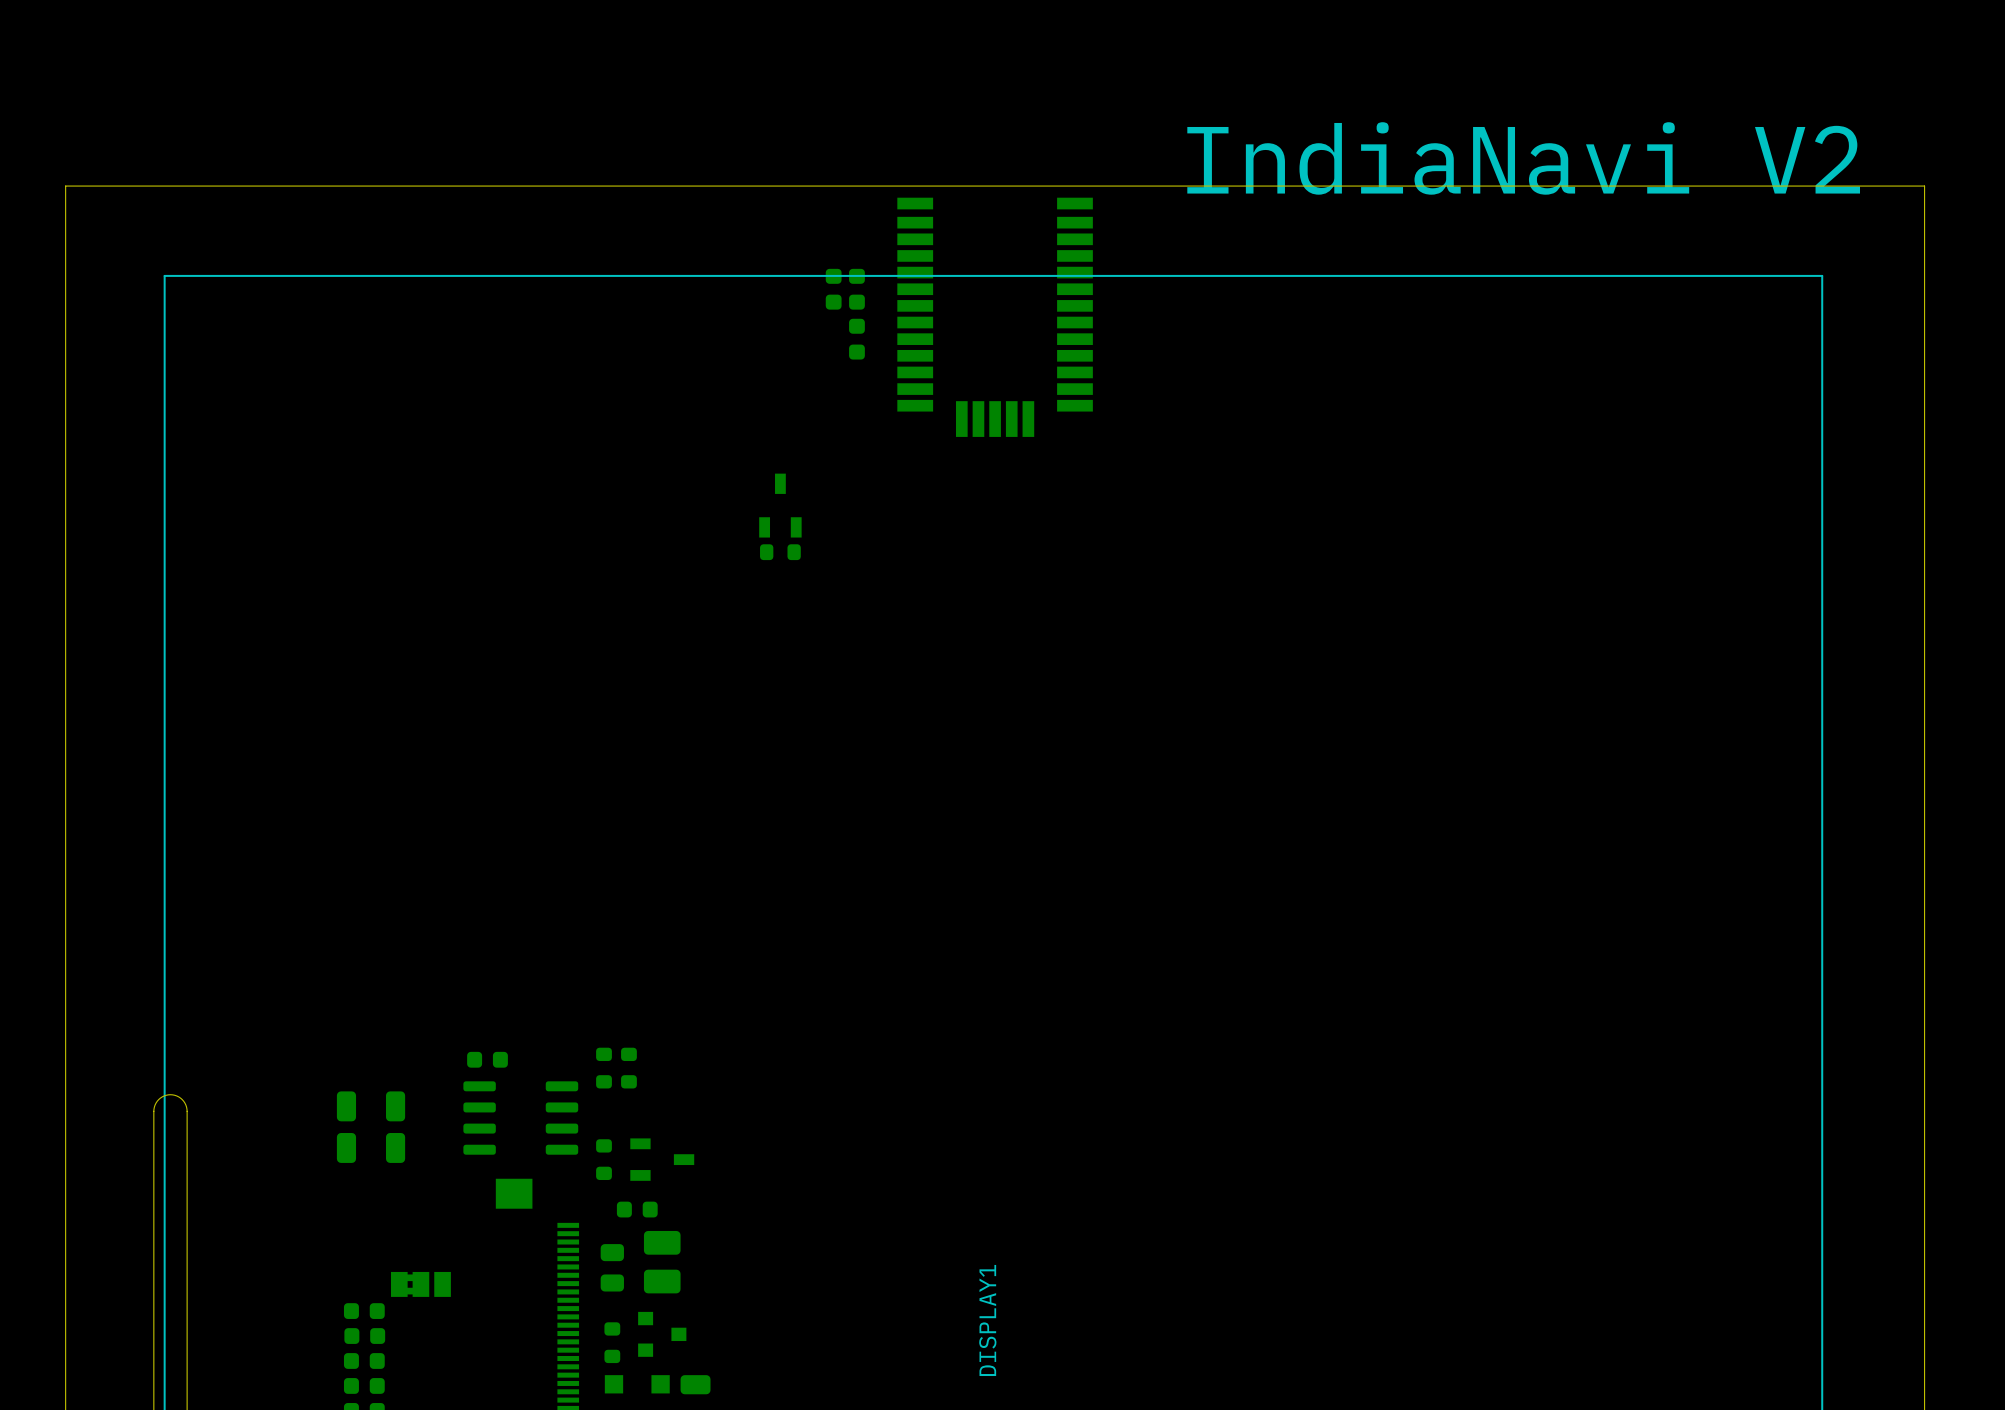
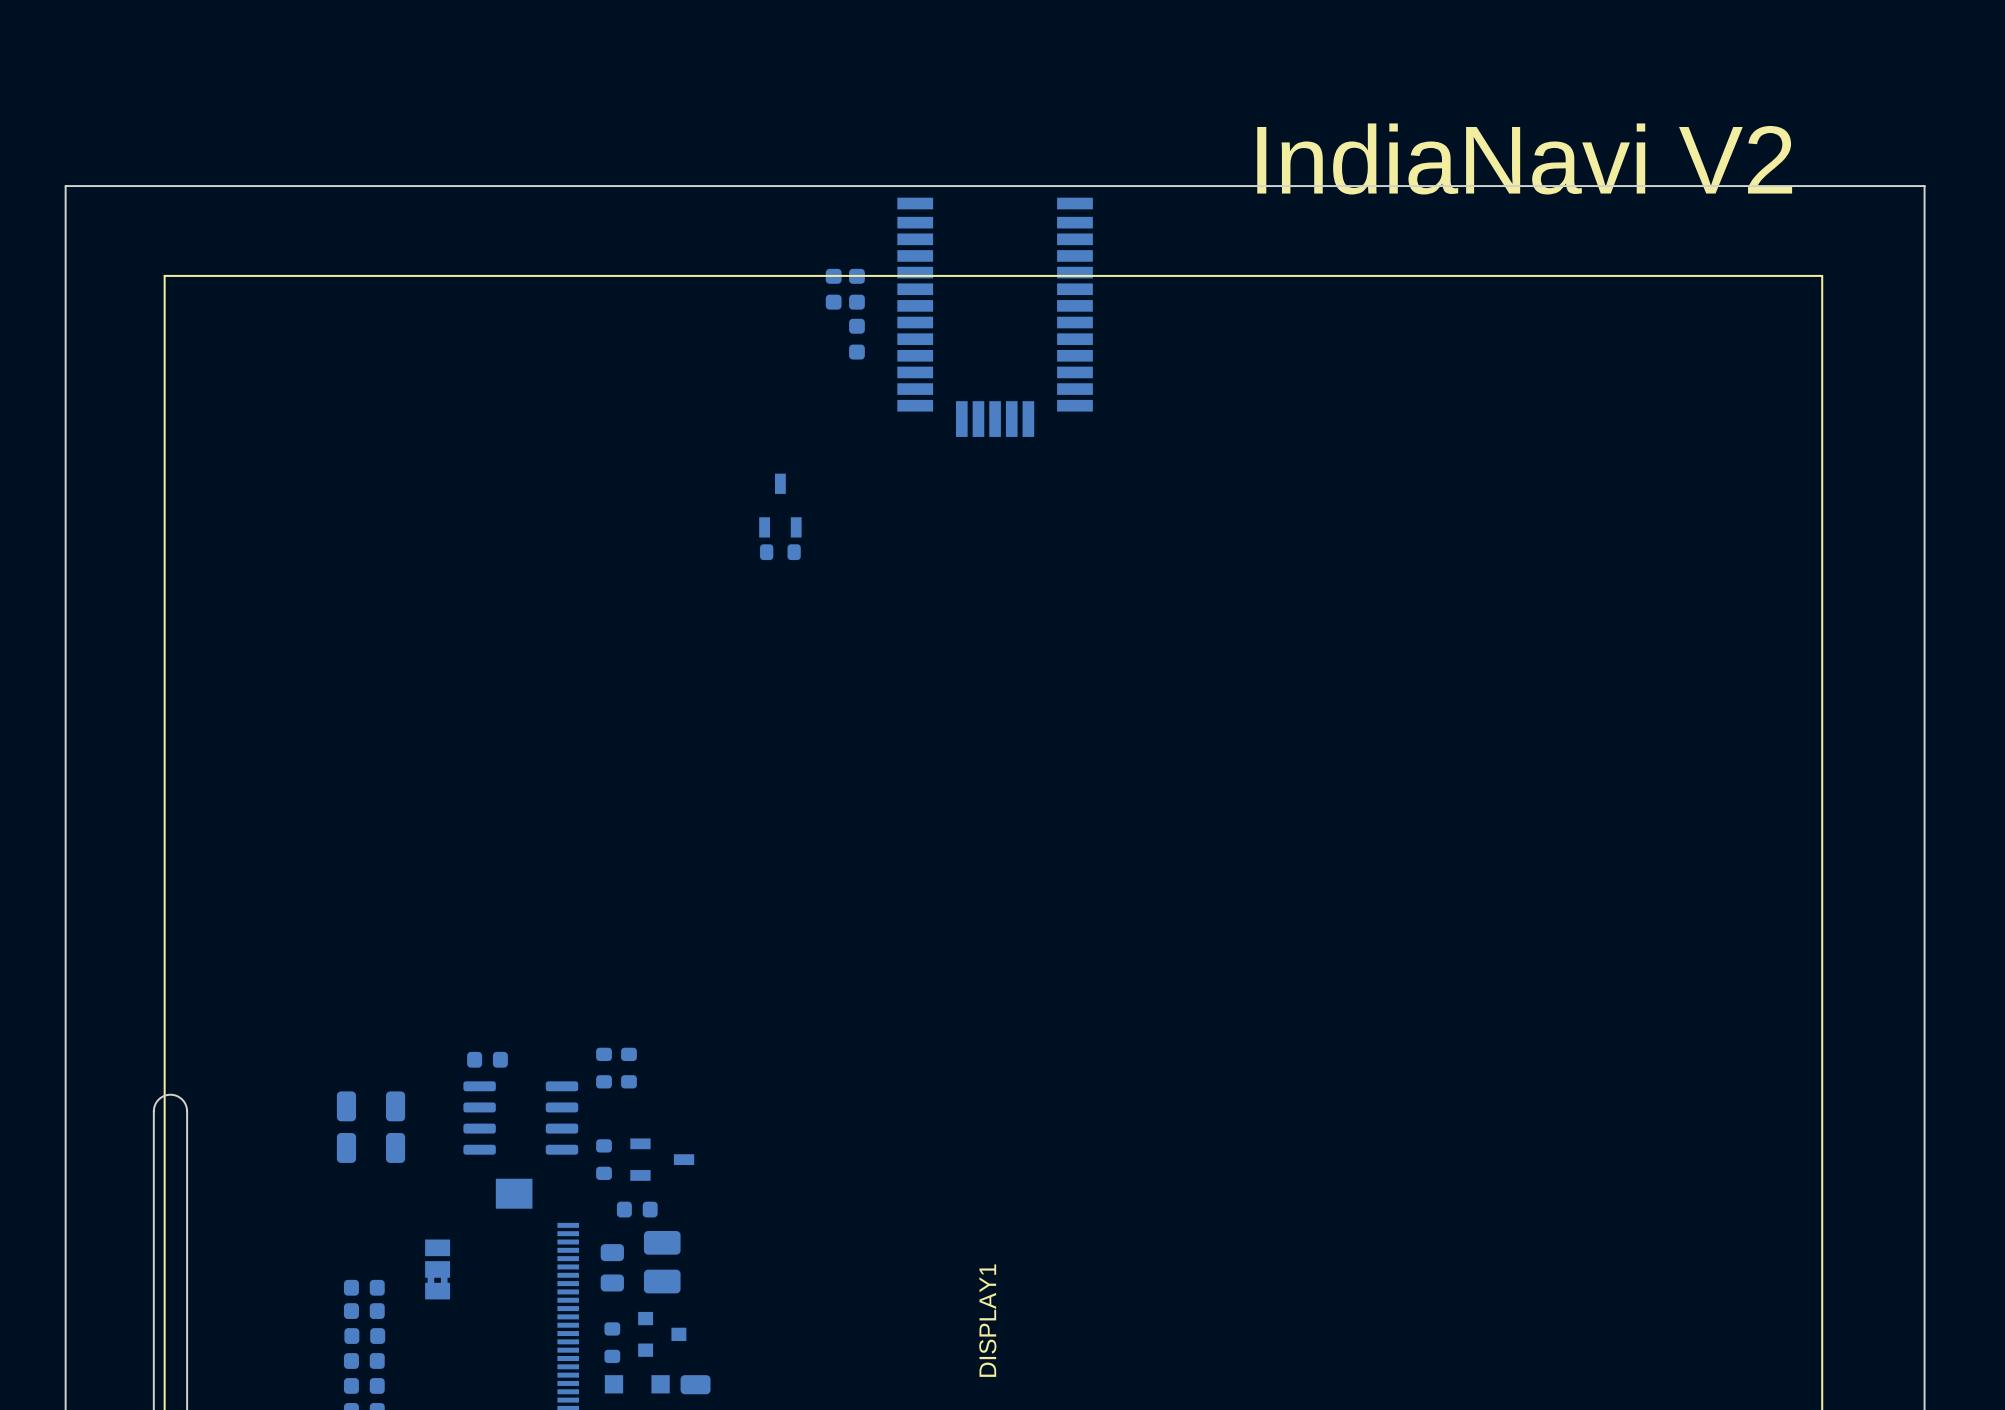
part rotation: 0° (420, 1284) -> 90° counterclockwise (437, 1269)
part: none -> (364, 1287)

